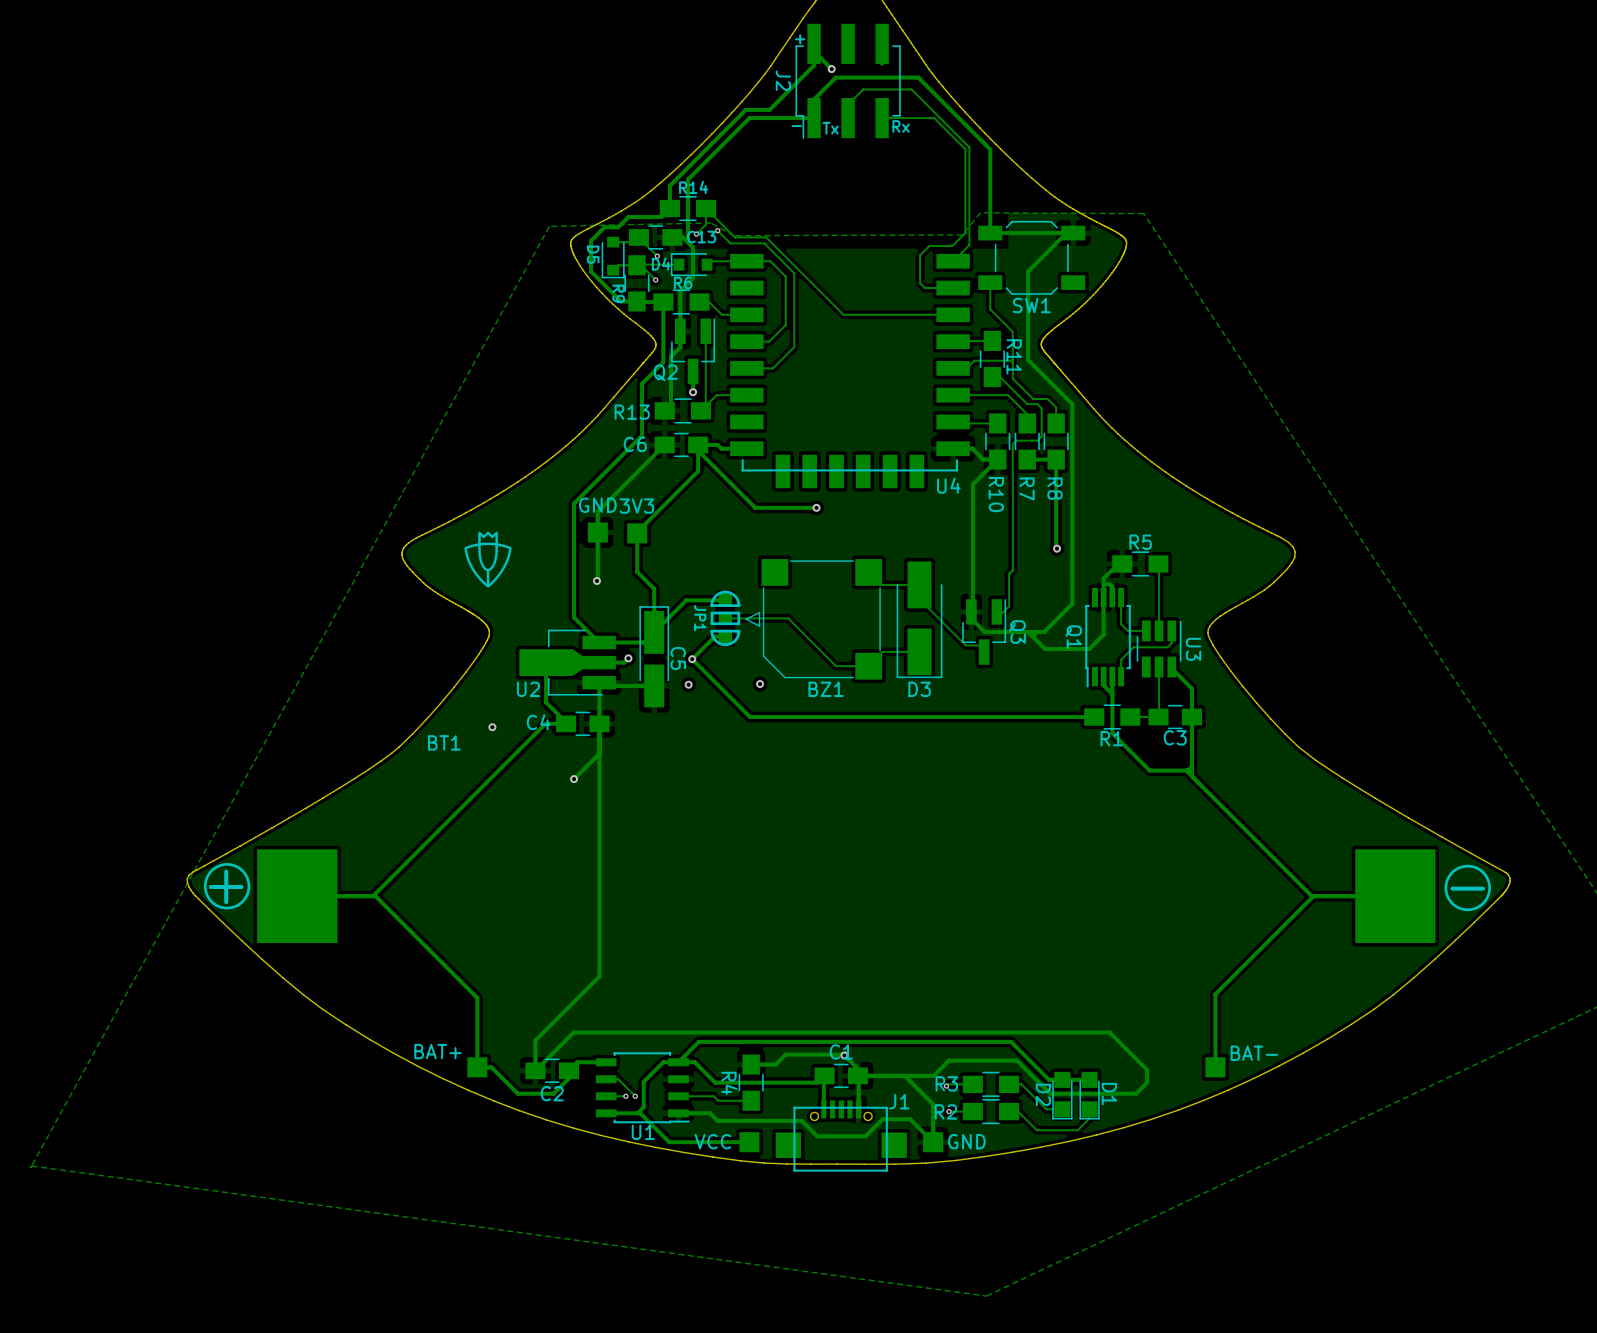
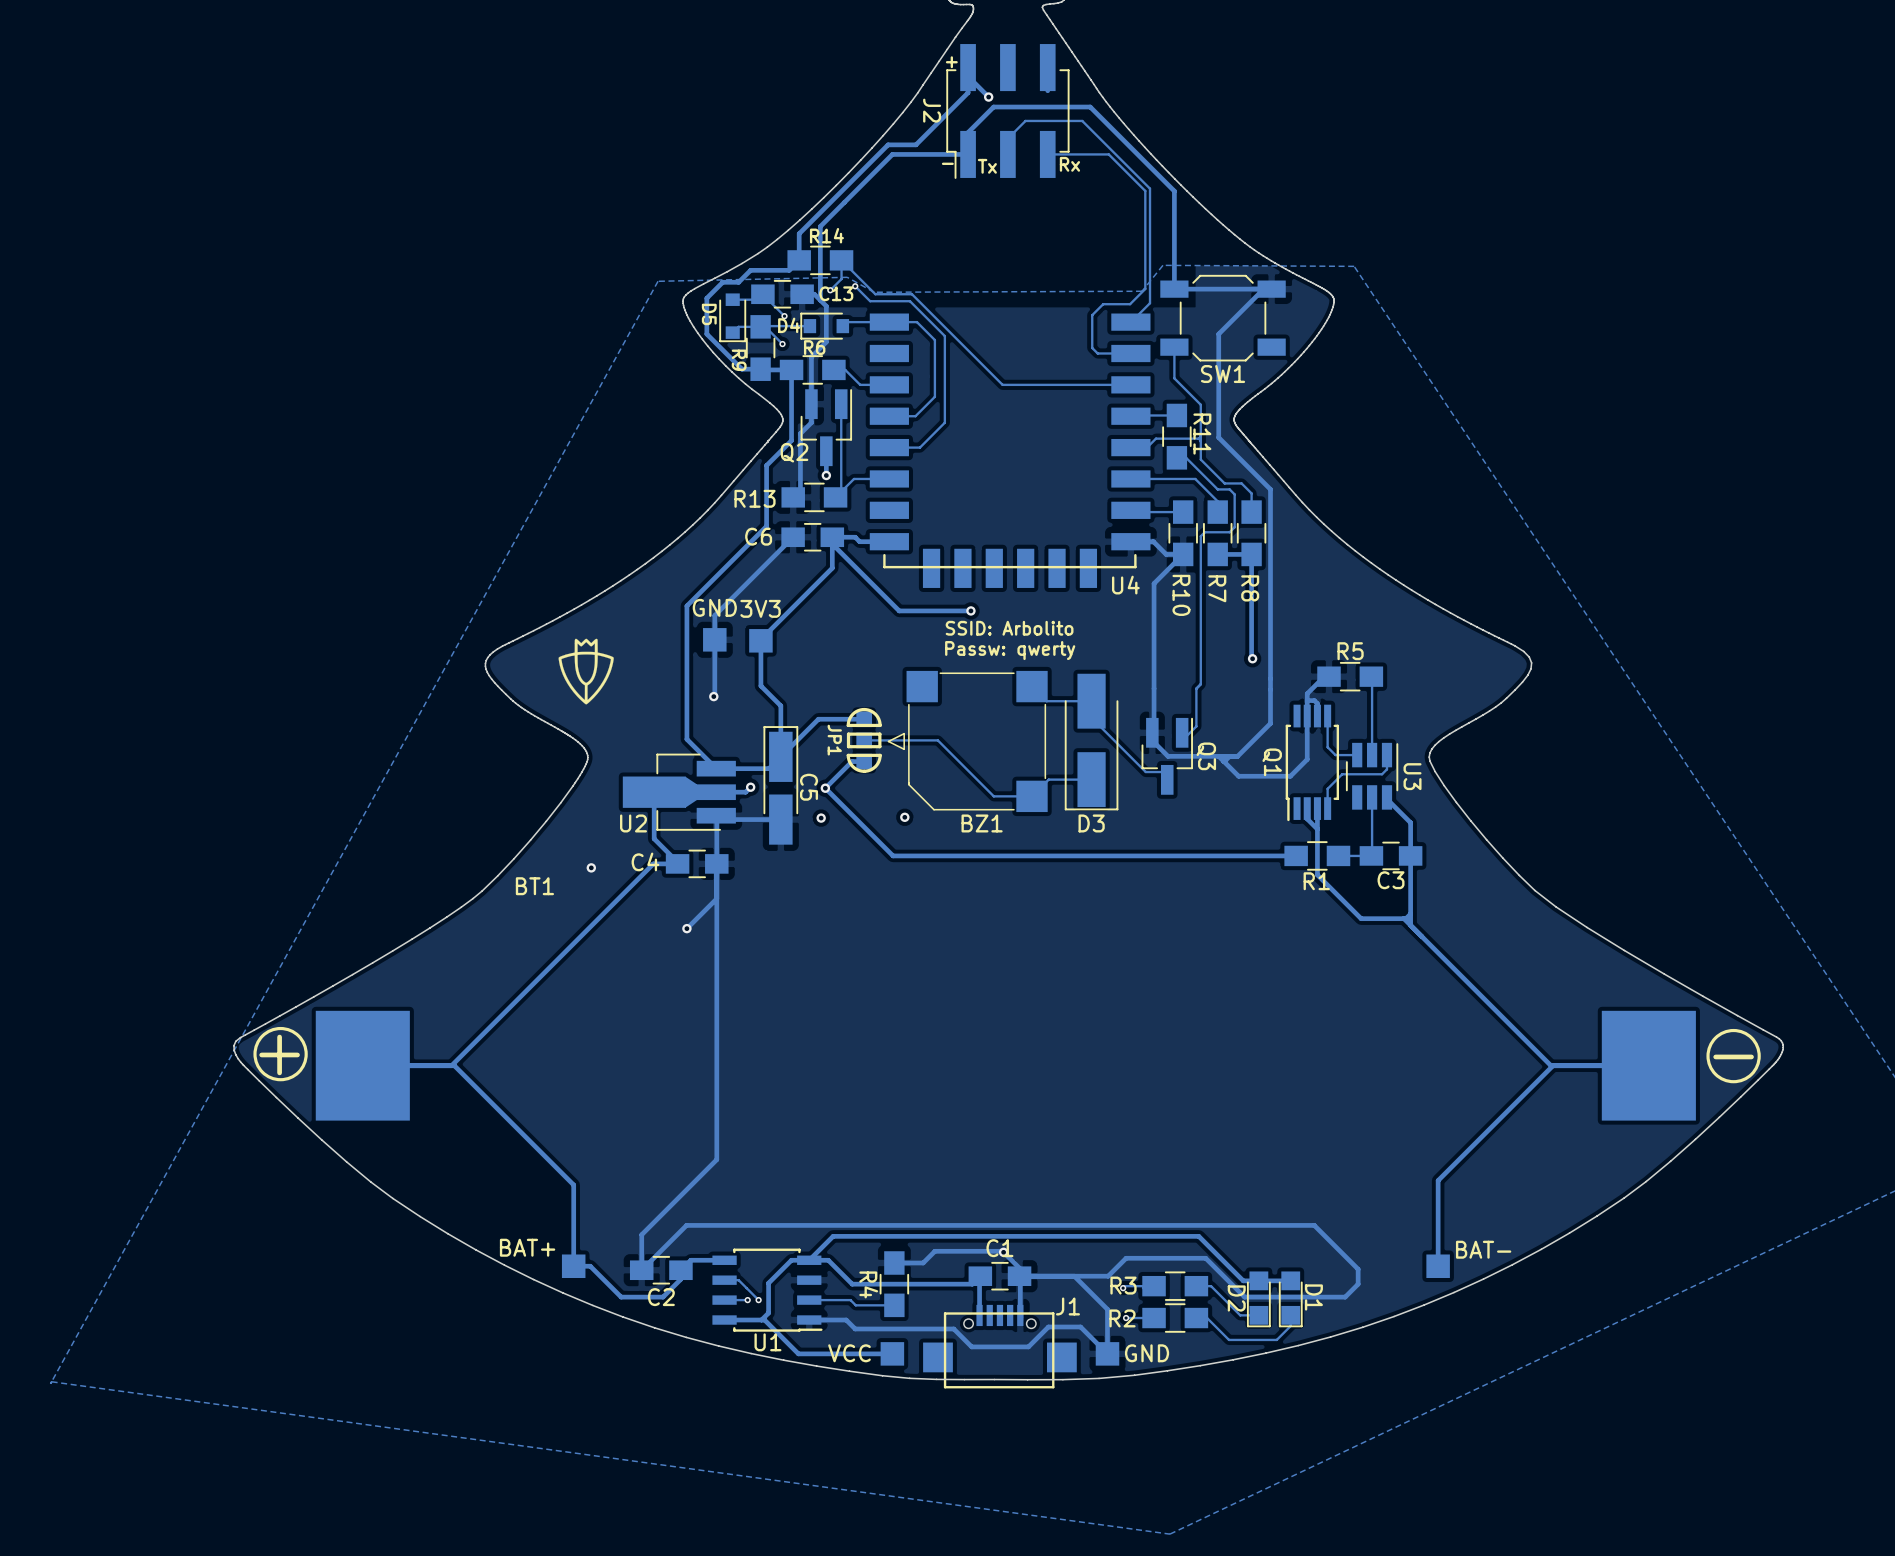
text: none -> SSID: Arbolito (1009, 628)
text: none -> Passw: qwerty (1010, 650)

